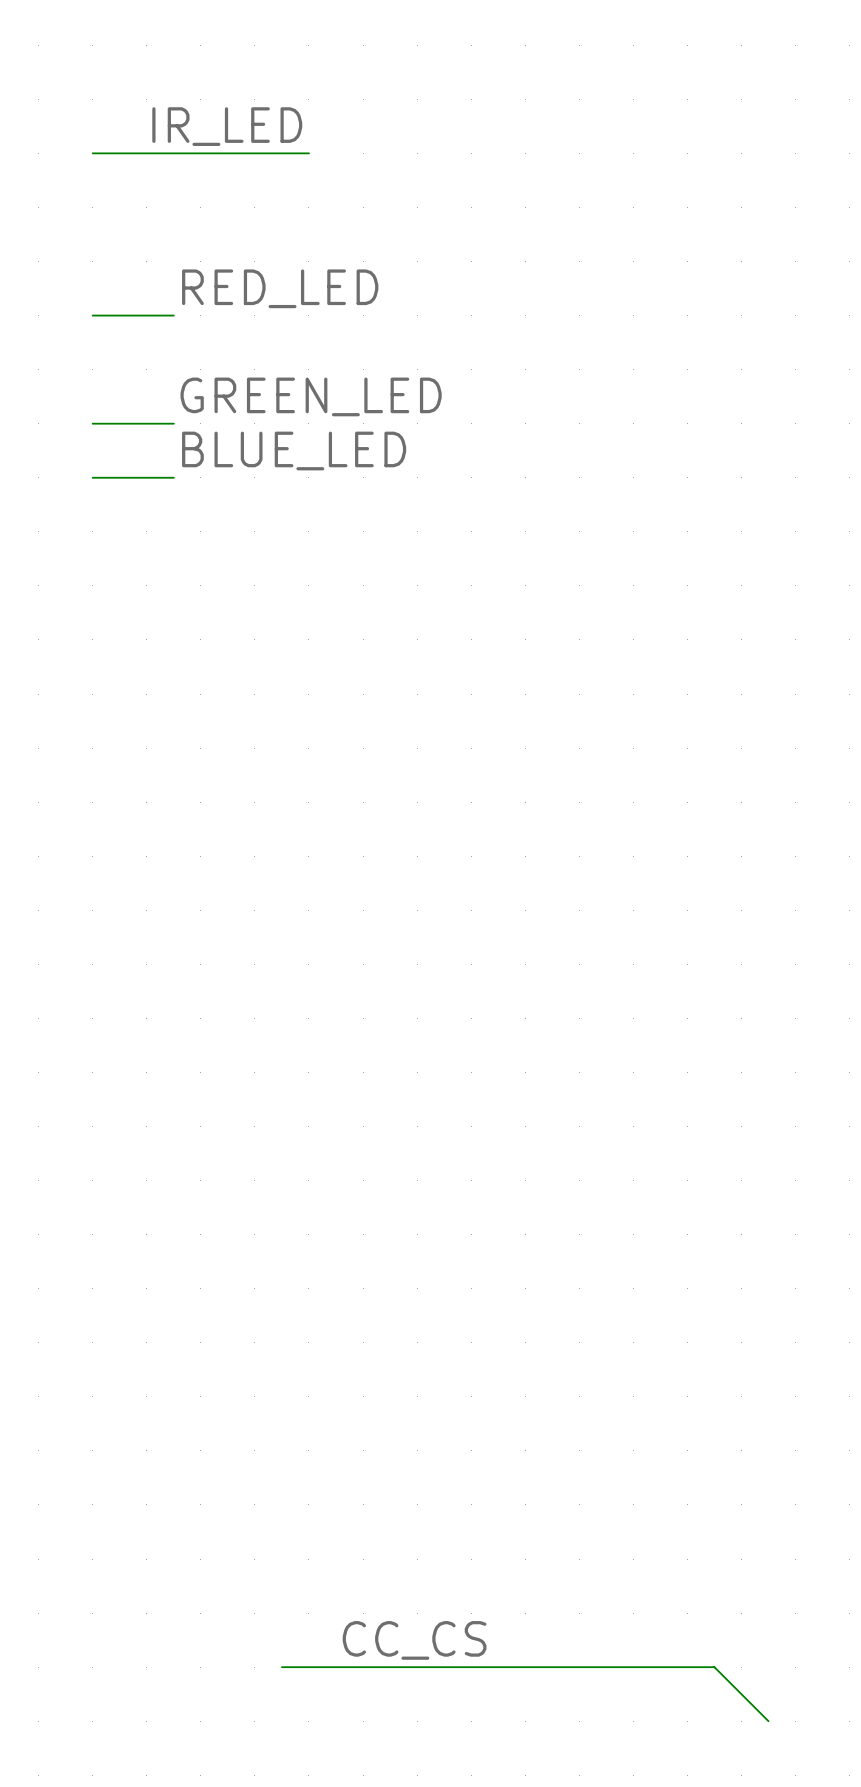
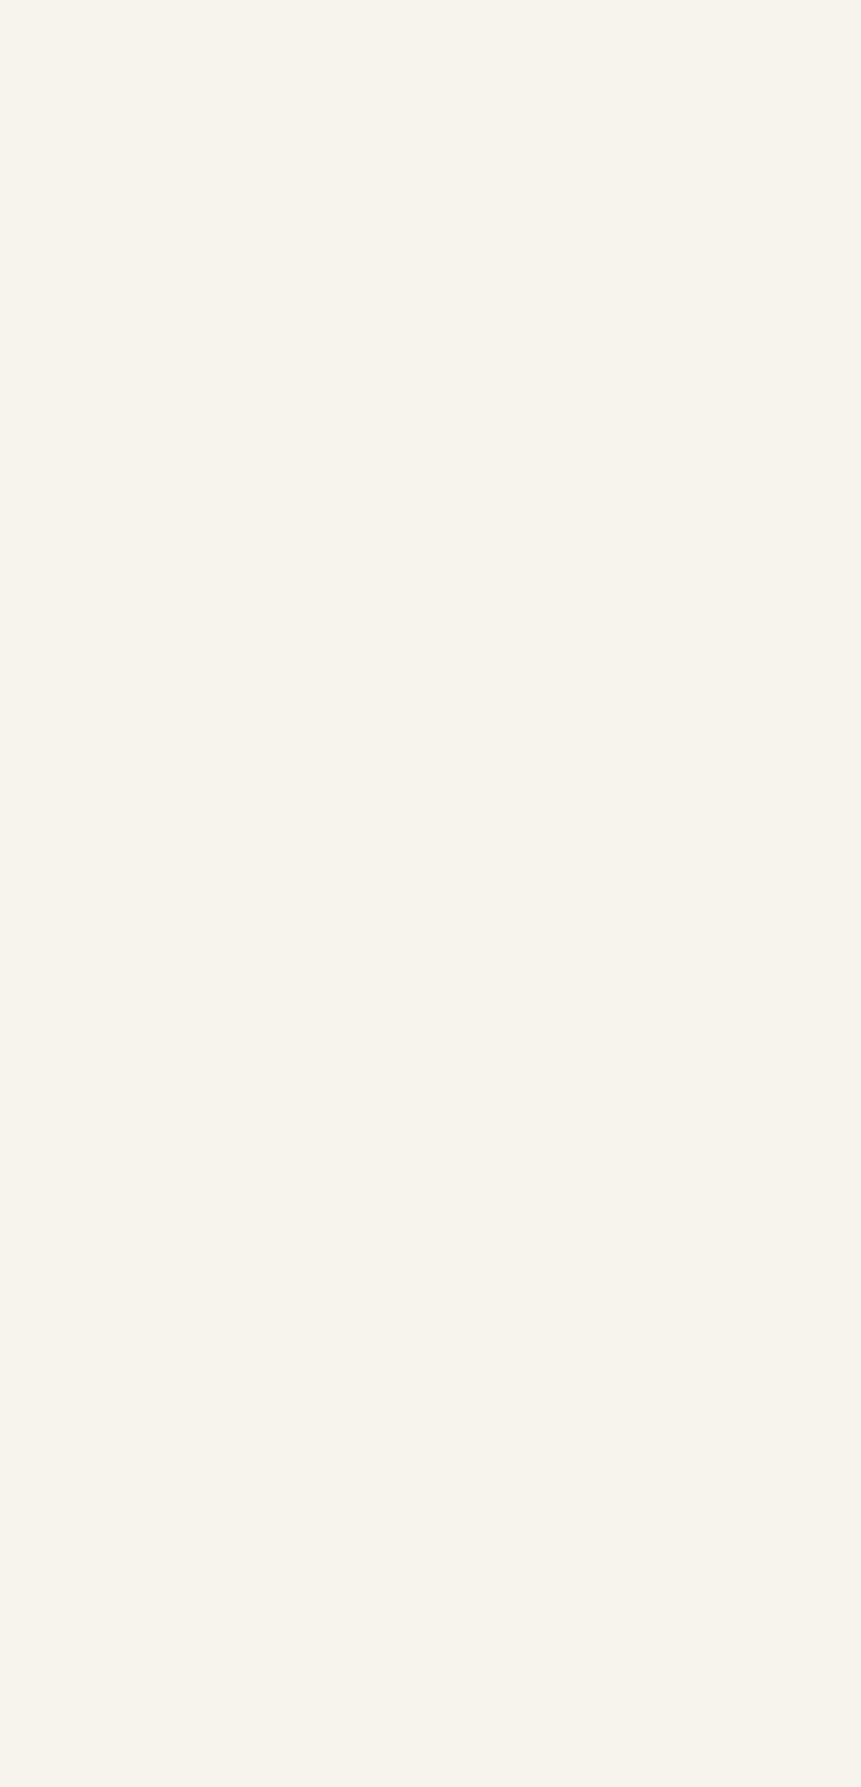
label: IR_LED (227, 126) -> none
wire: (92, 153) (308, 153) -> none
label: RED_LED (280, 288) -> none
wire: (92, 315) (173, 315) -> none
label: GREEN_LED (311, 396) -> none
wire: (92, 423) (173, 423) -> none
label: BLUE_LED (294, 451) -> none
wire: (92, 477) (173, 477) -> none
label: CC_CS (414, 1640) -> none
wire: (281, 1667) (714, 1667) (768, 1721) -> none

